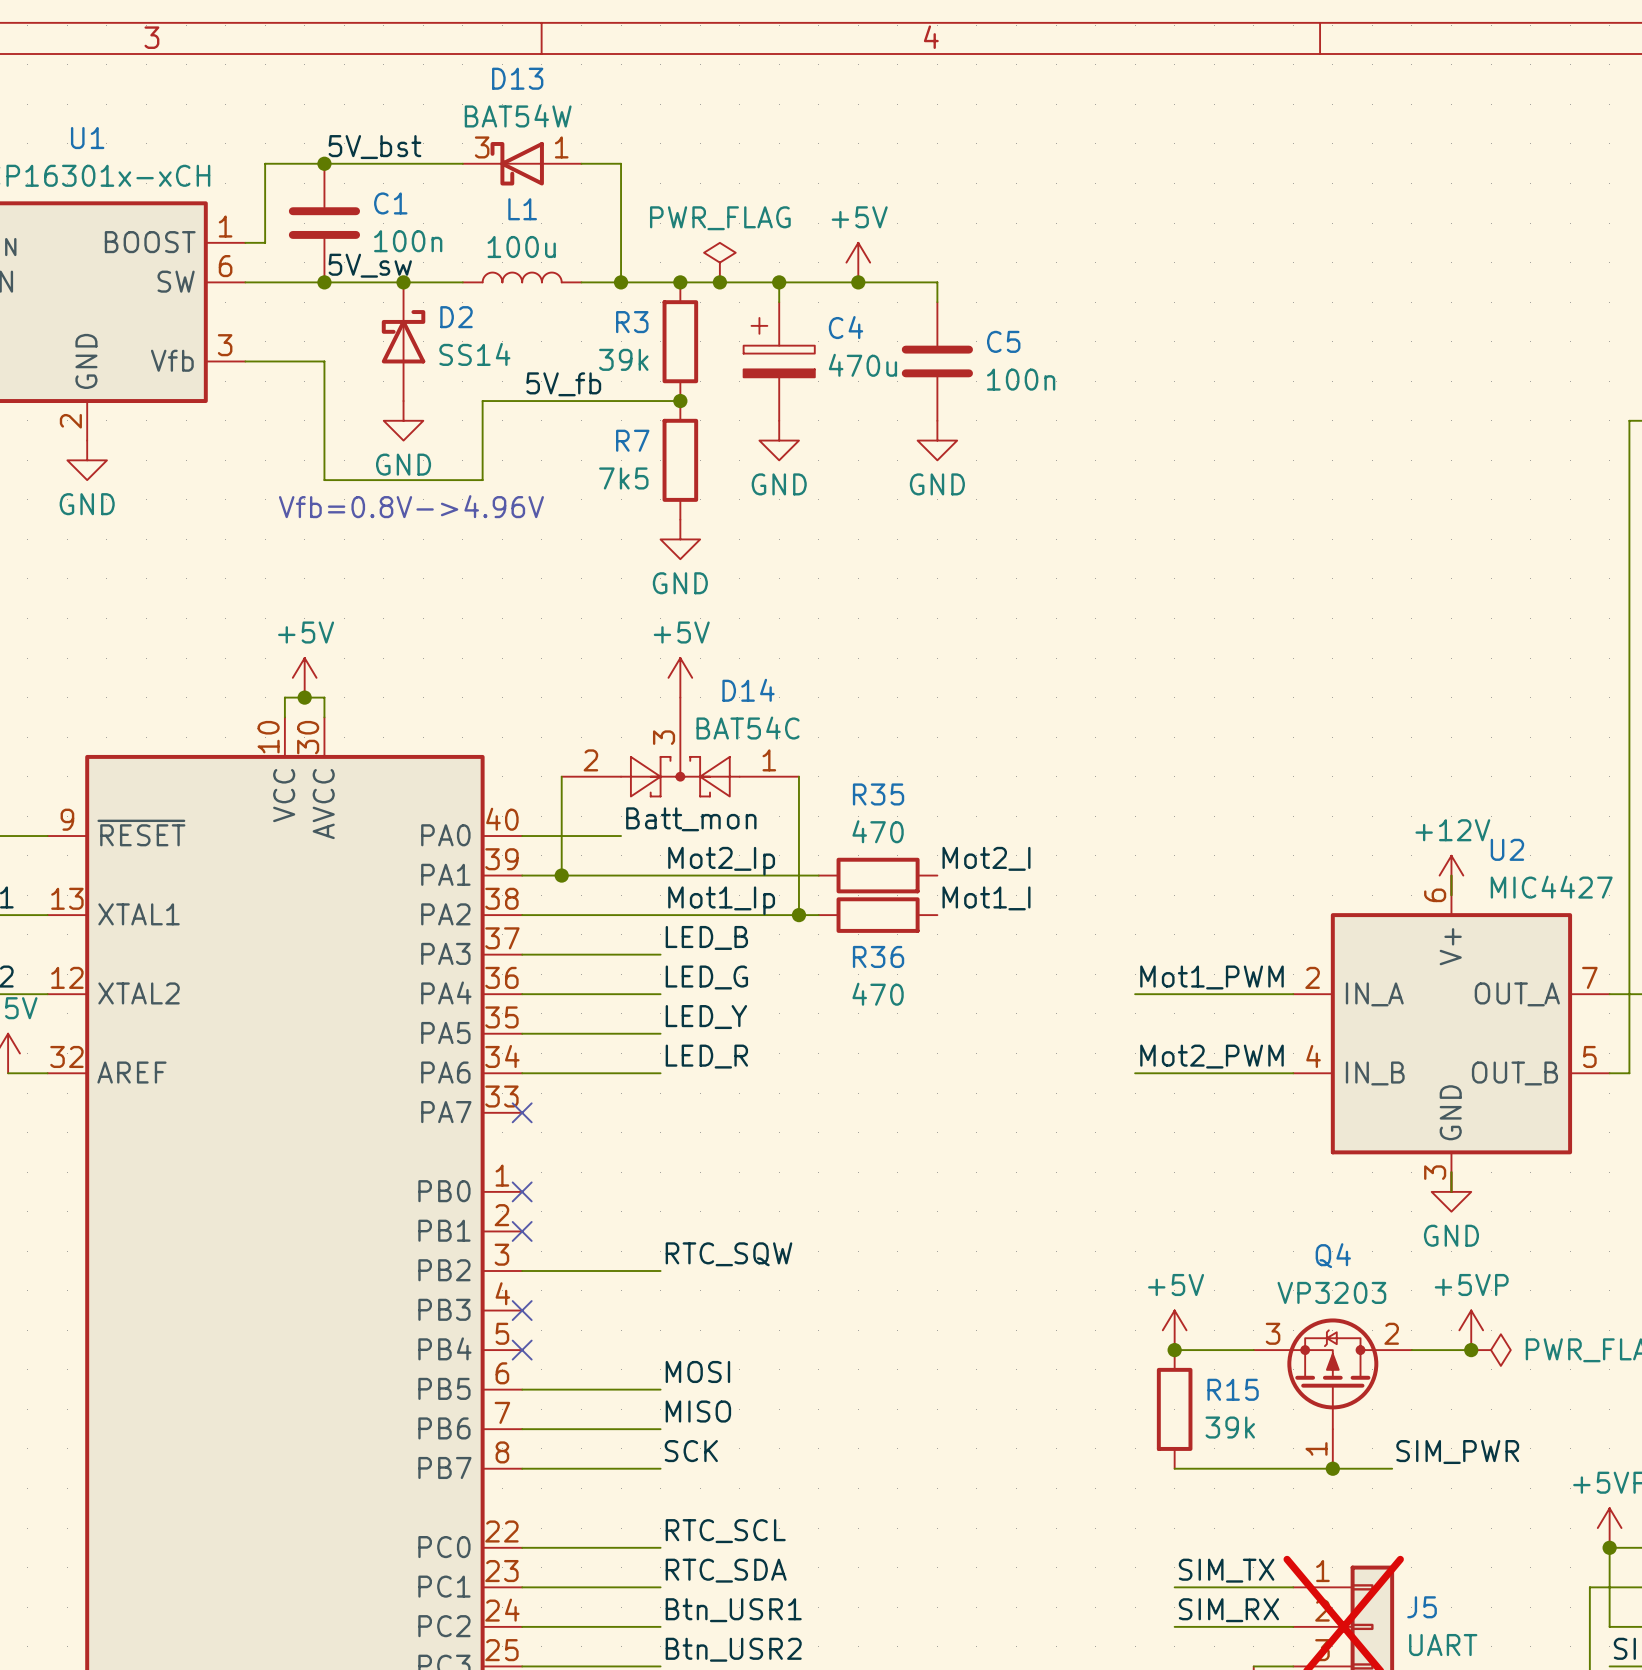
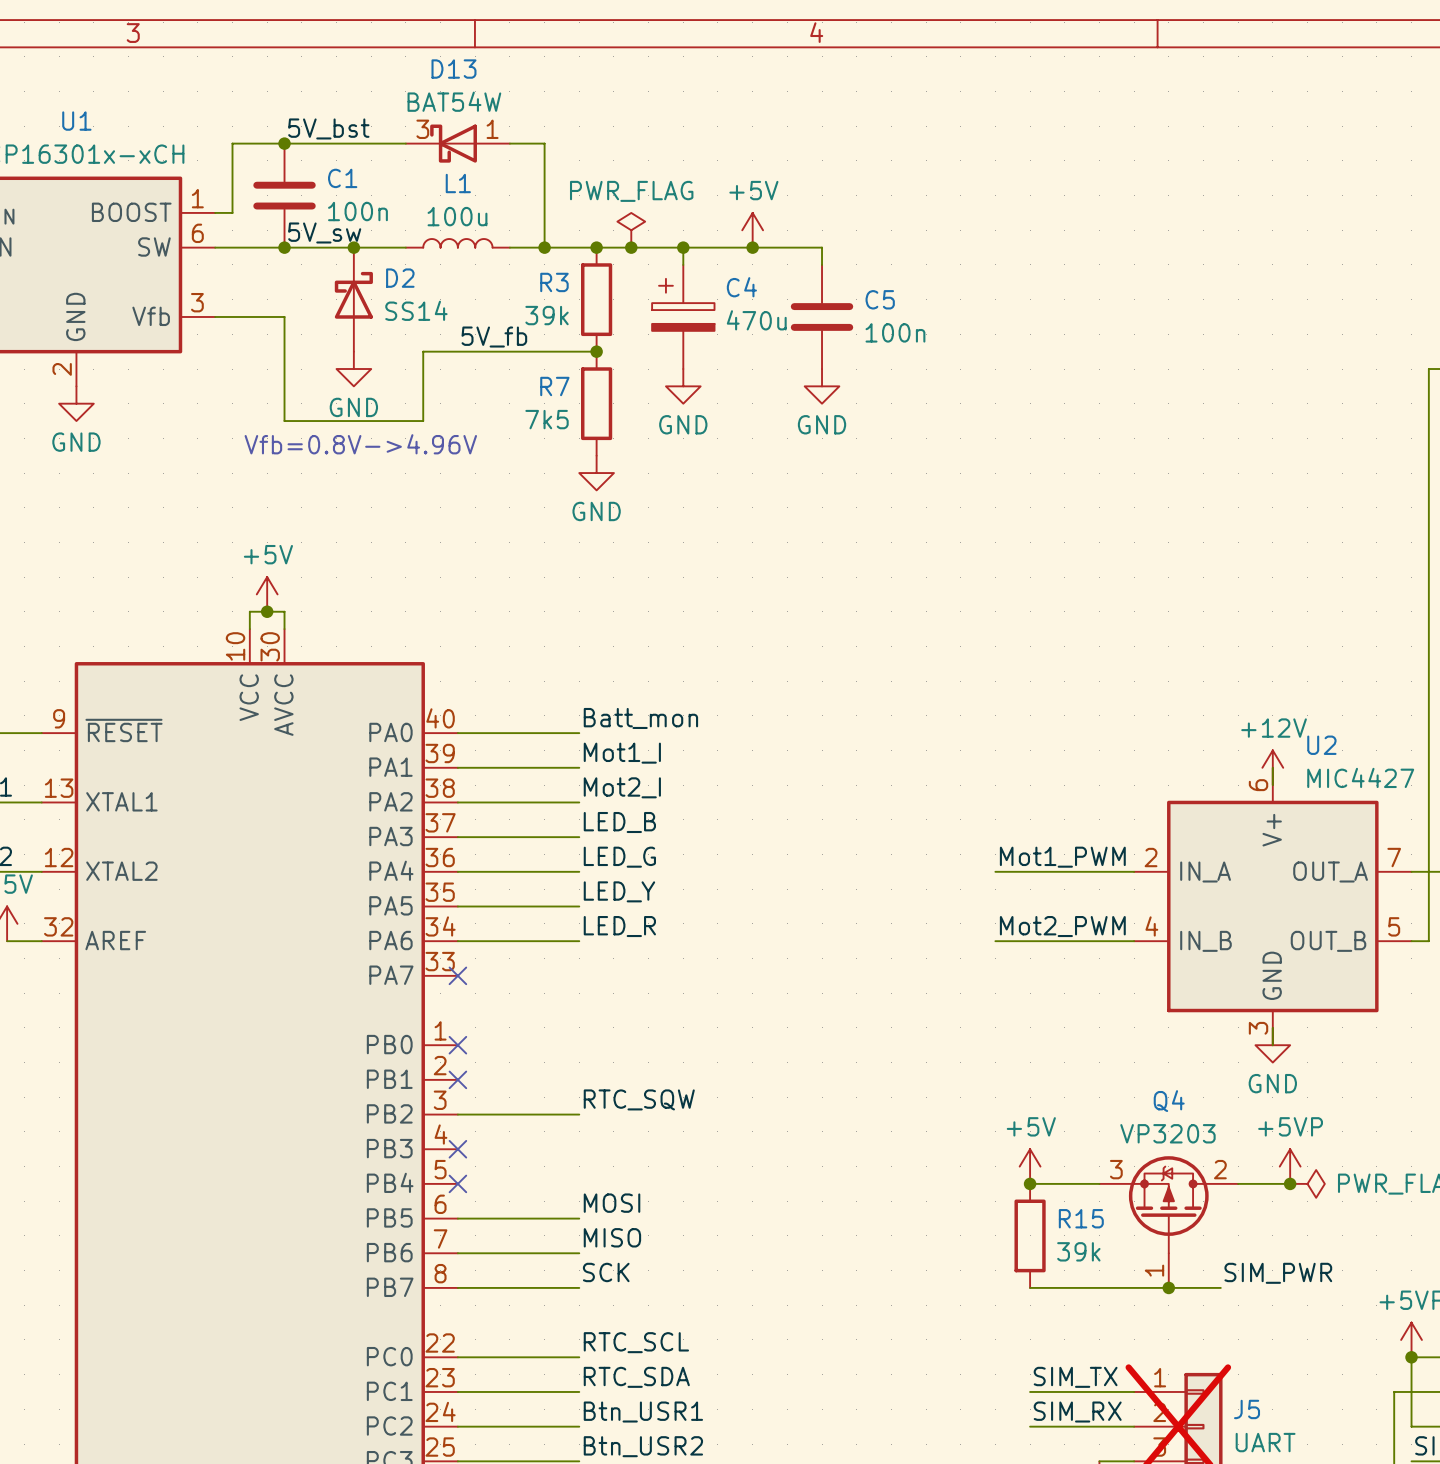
power symbol: +5V (680, 677) -> none
D14: BAT54C (680, 747) -> none
wire: (561, 776) (561, 875) -> none
wire: (798, 776) (798, 915) -> none
label position: Batt_mon (691, 819) -> Batt_mon (640, 718)
wire: none -> (544, 733) (579, 733)
label position: Mot2_I (986, 858) -> Mot2_I (622, 787)
label: Mot2_Ip (721, 861) -> none
junction: (561, 875) -> none
wire: (660, 875) (818, 875) -> none
R35: 470 (878, 875) -> none
label position: Mot1_I (986, 898) -> Mot1_I (622, 753)
label: Mot1_Ip (721, 900) -> none
wire: (660, 915) (818, 915) -> none
junction: (798, 915) -> none
R36: 470 (878, 915) -> none

